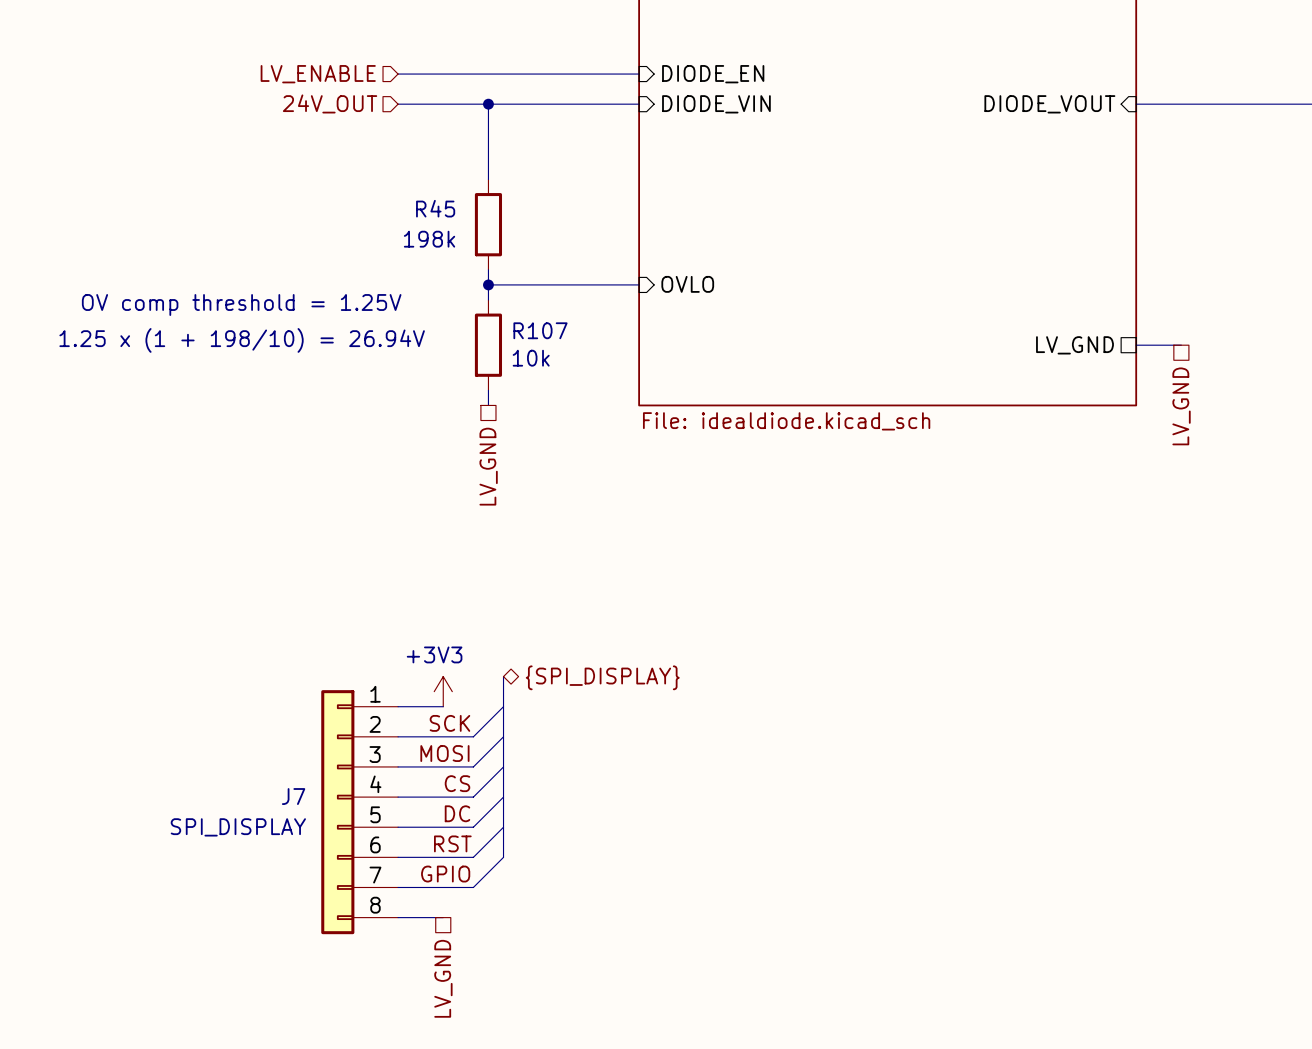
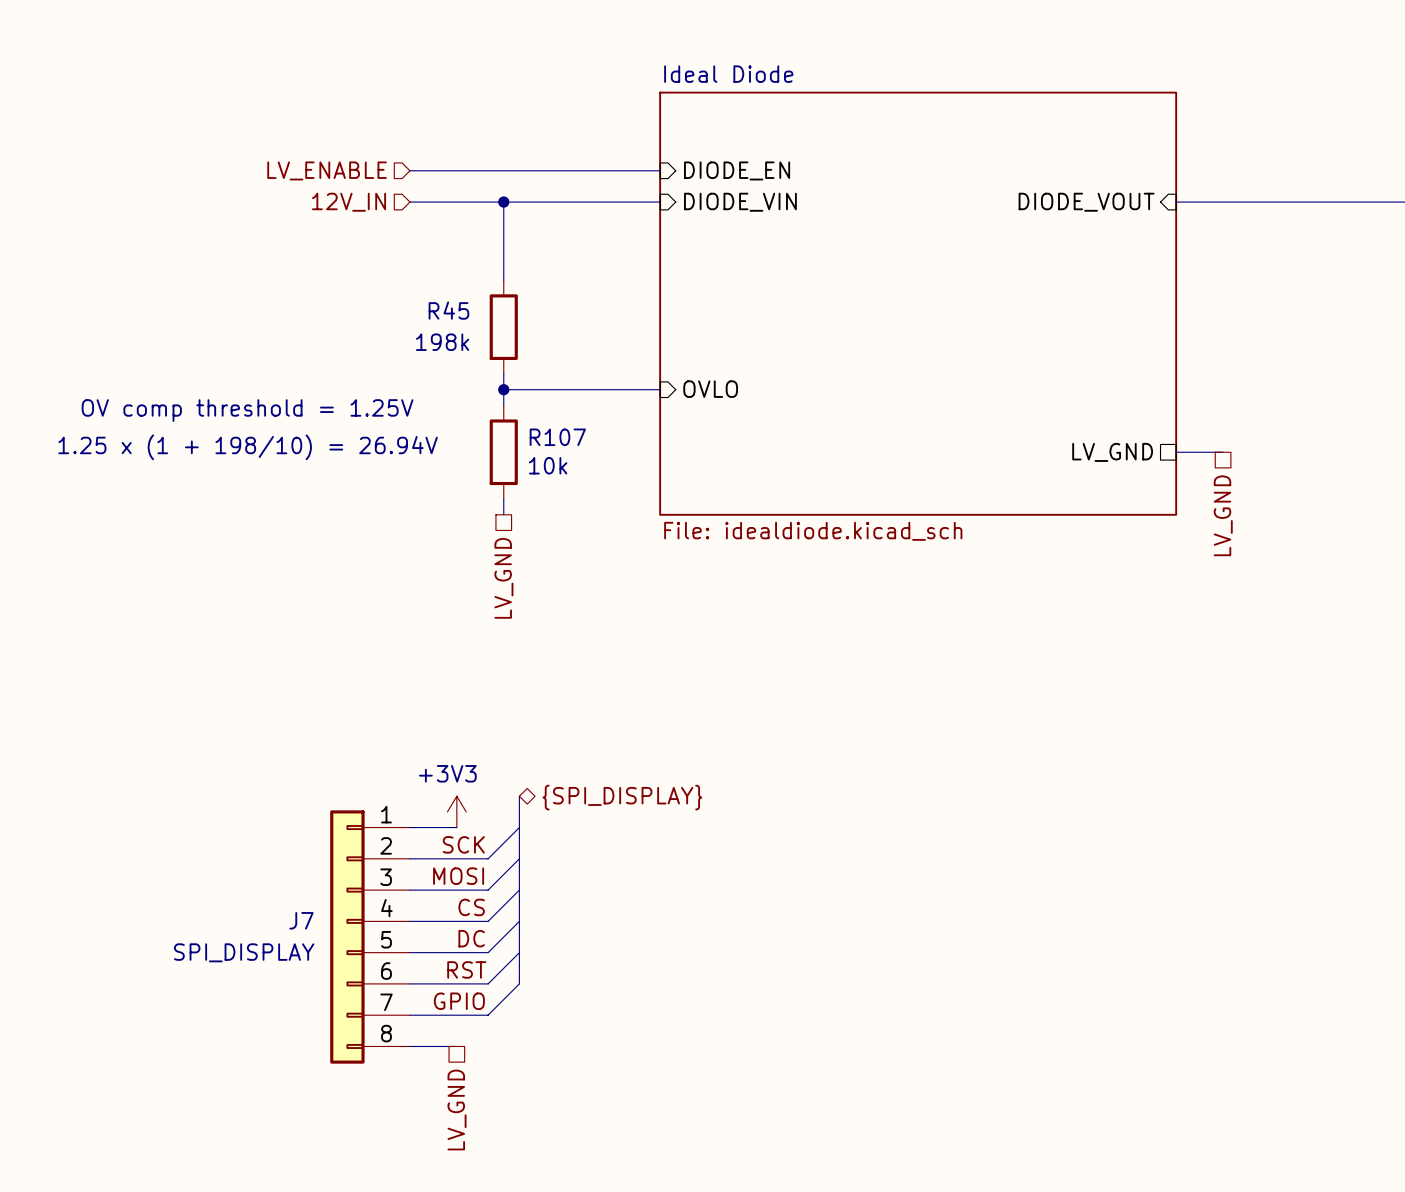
hierarchical label: 24V_OUT (330, 103) -> 12V_IN (349, 202)

